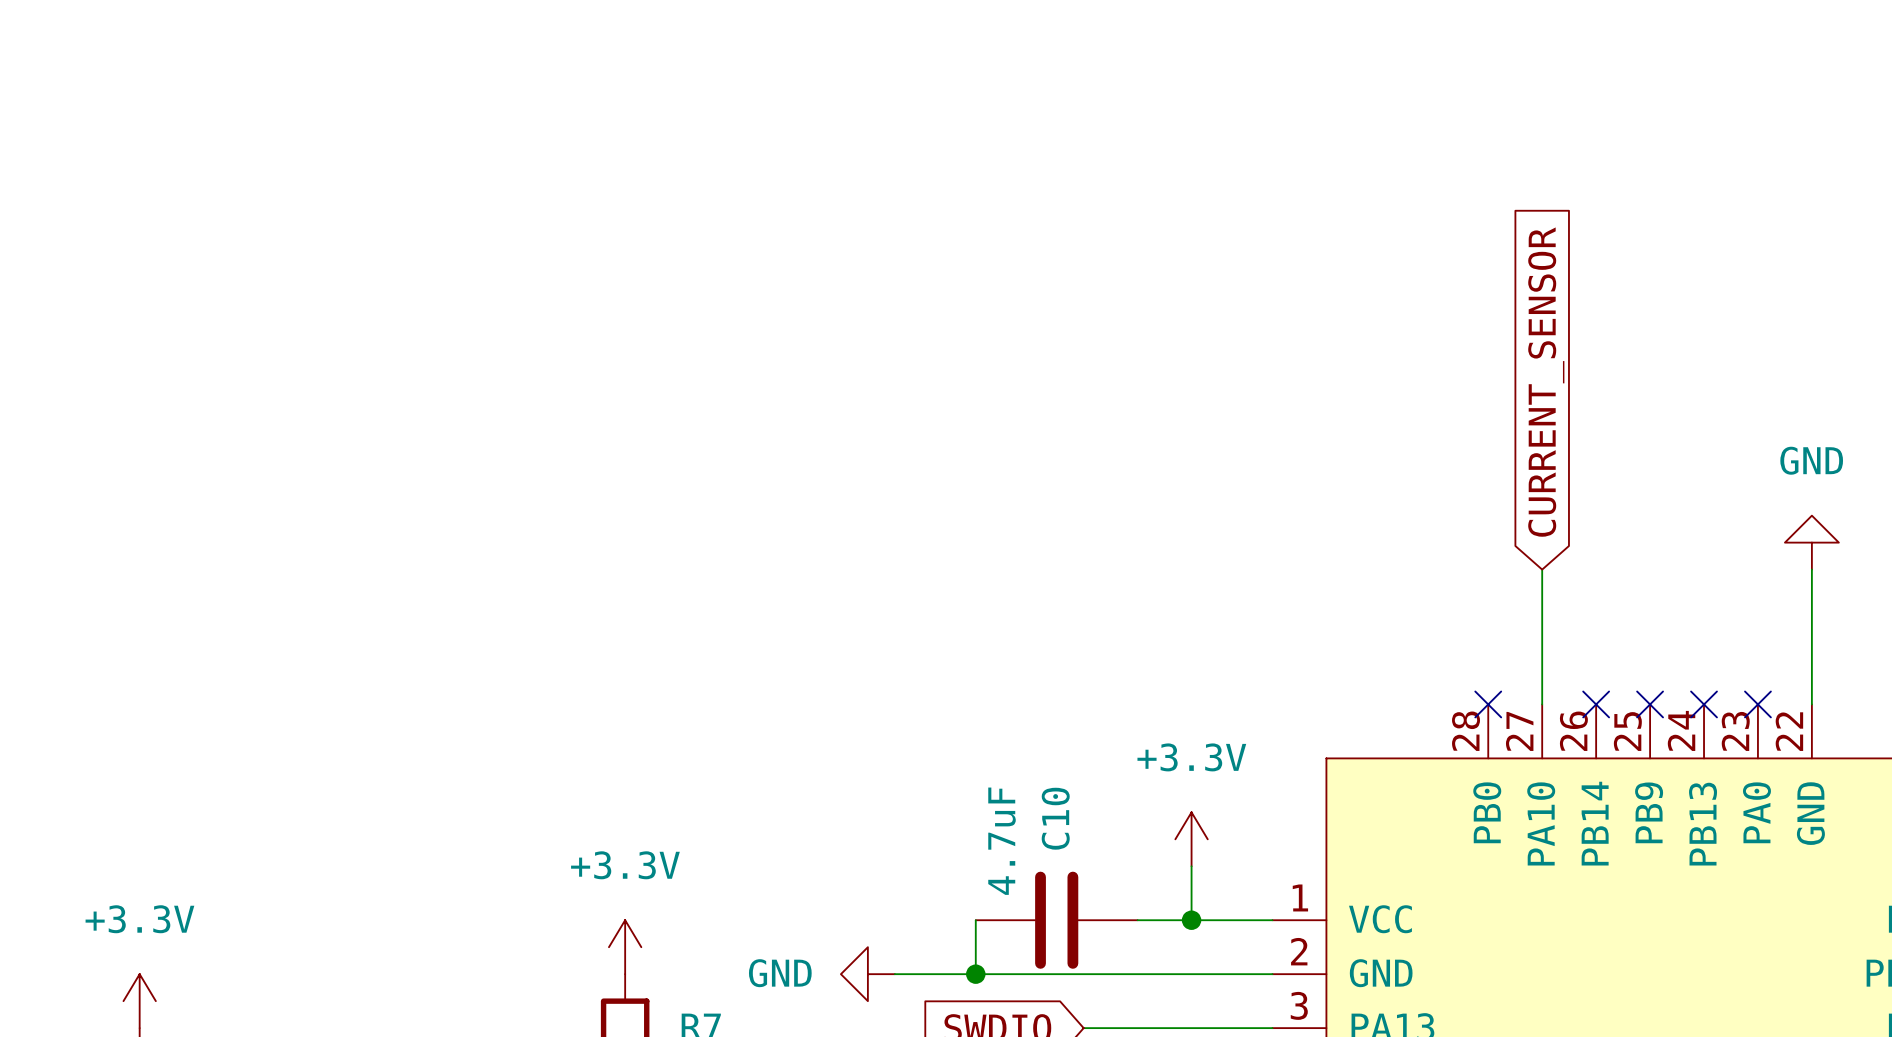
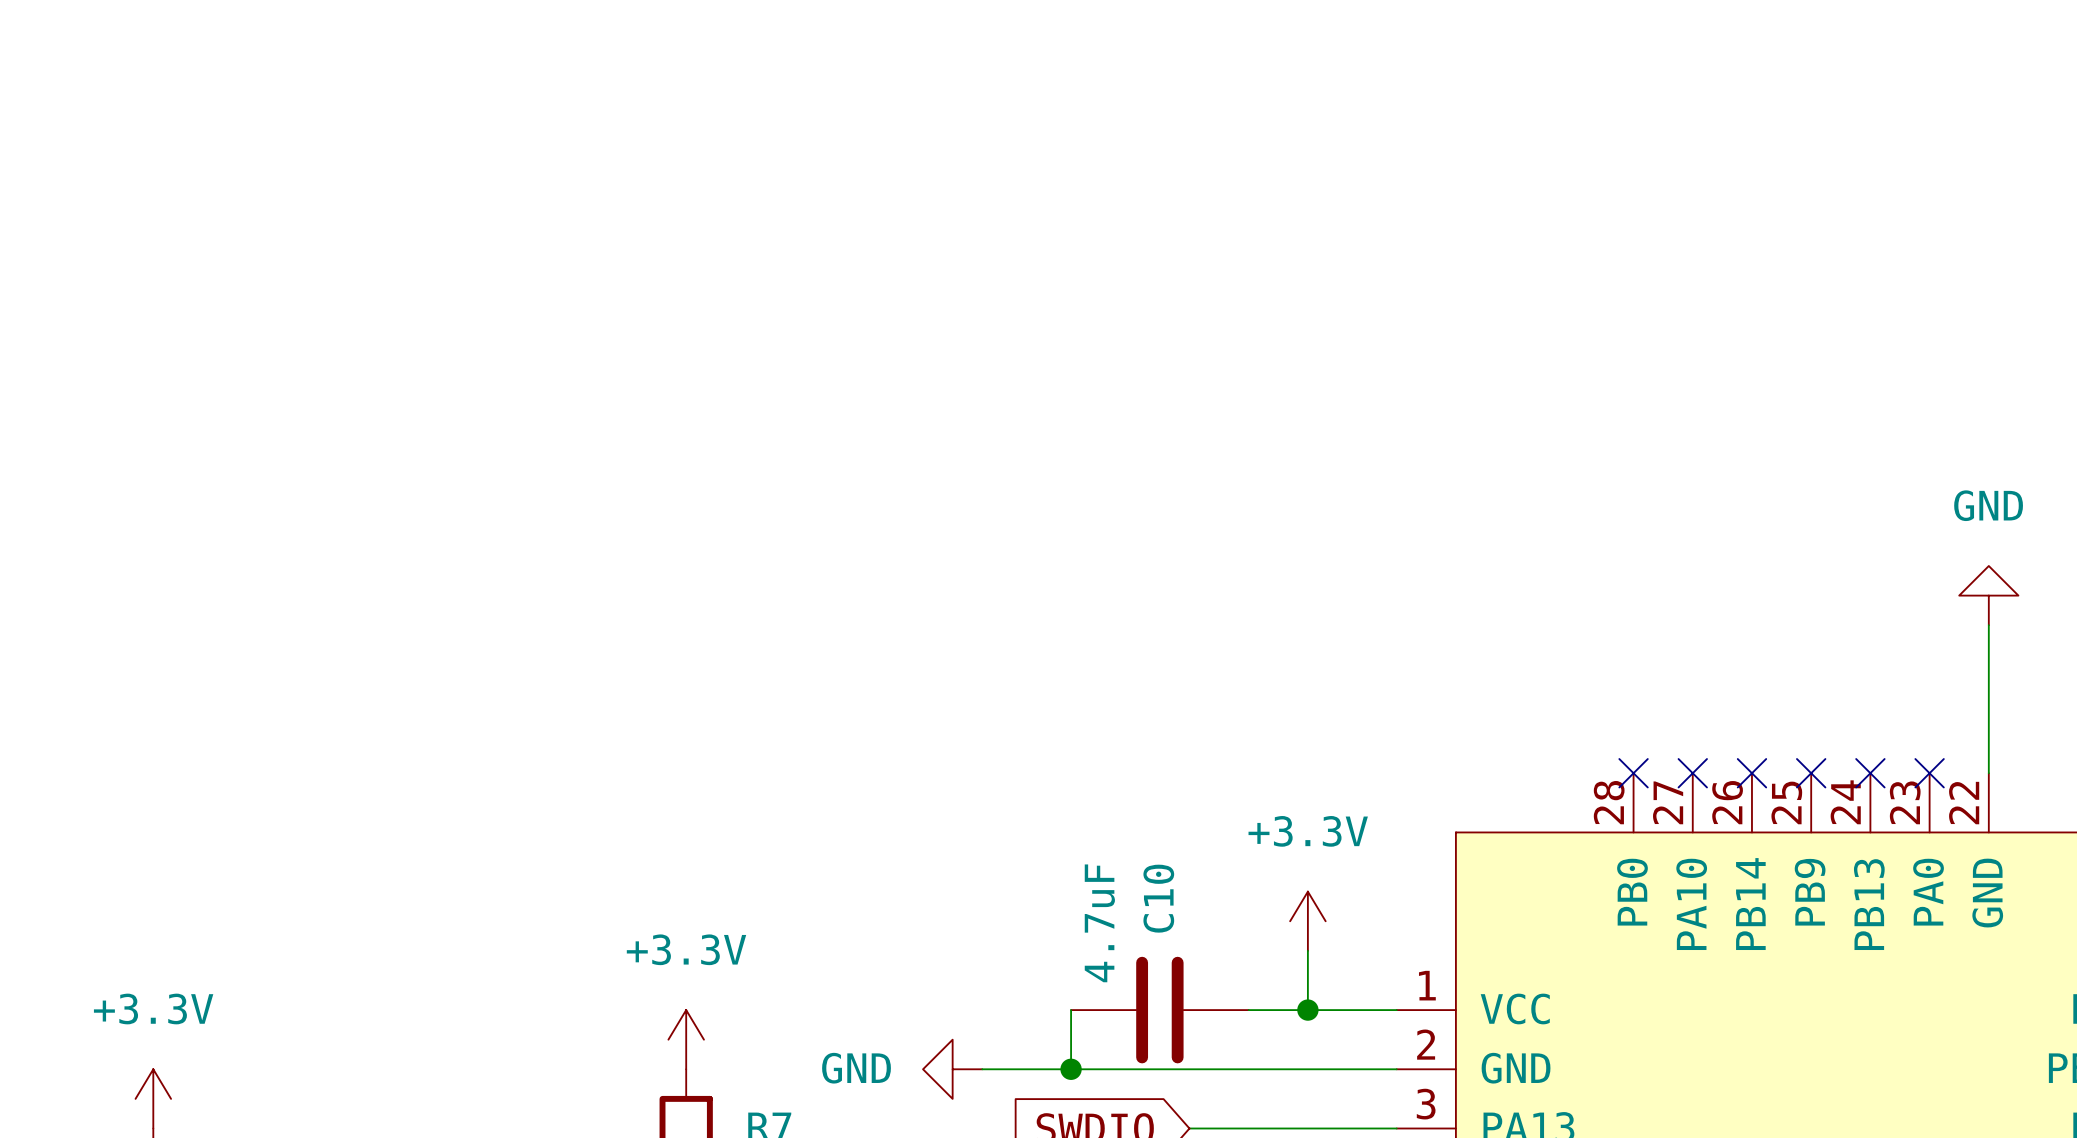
global label: CURRENT_SENSOR (1546, 382) -> none
wire: (1542, 569) (1542, 704) -> none
no-connect mark: none -> (1692, 773)

